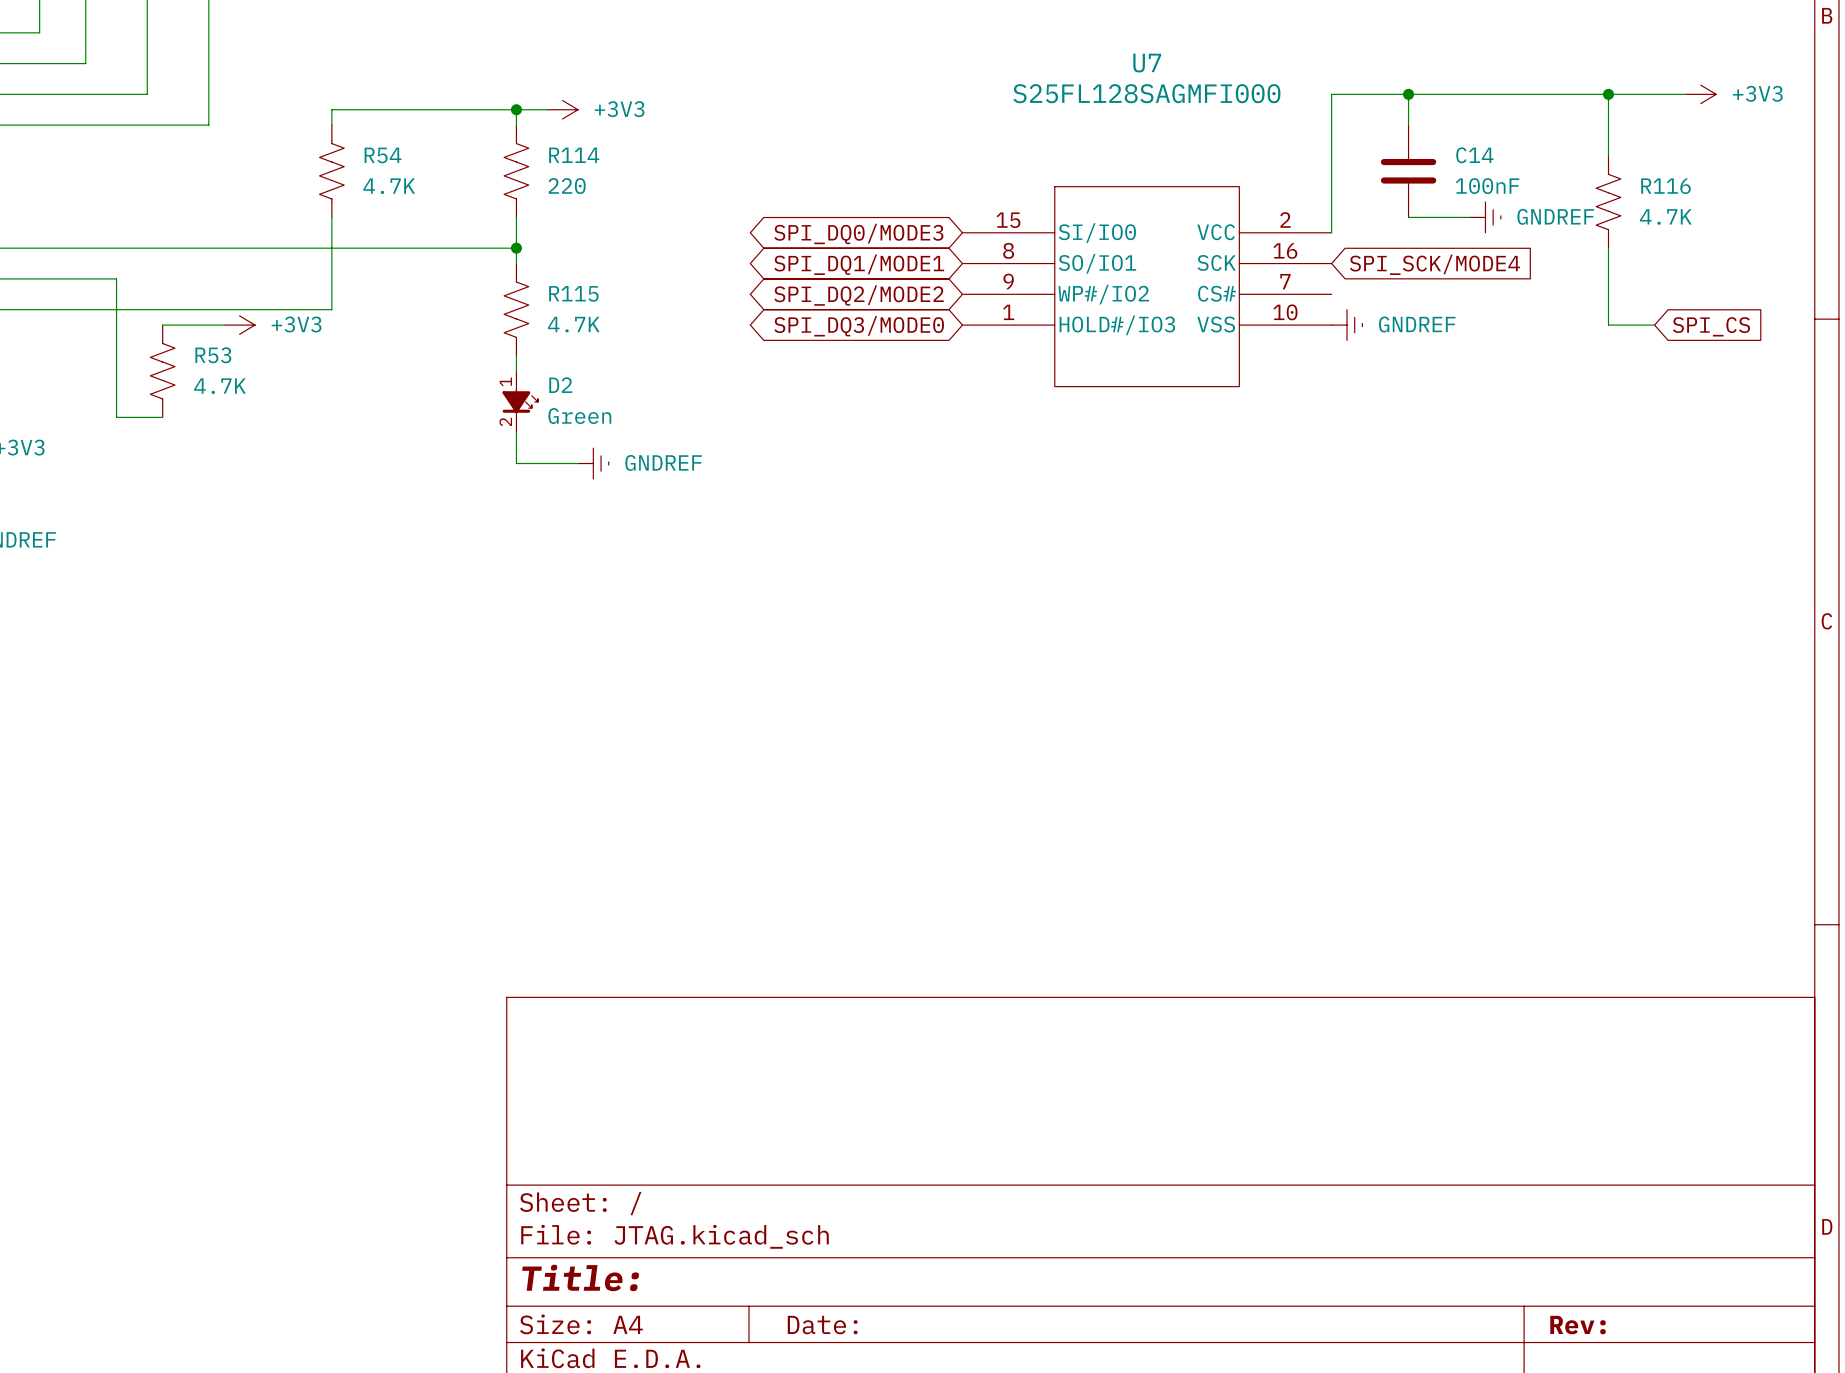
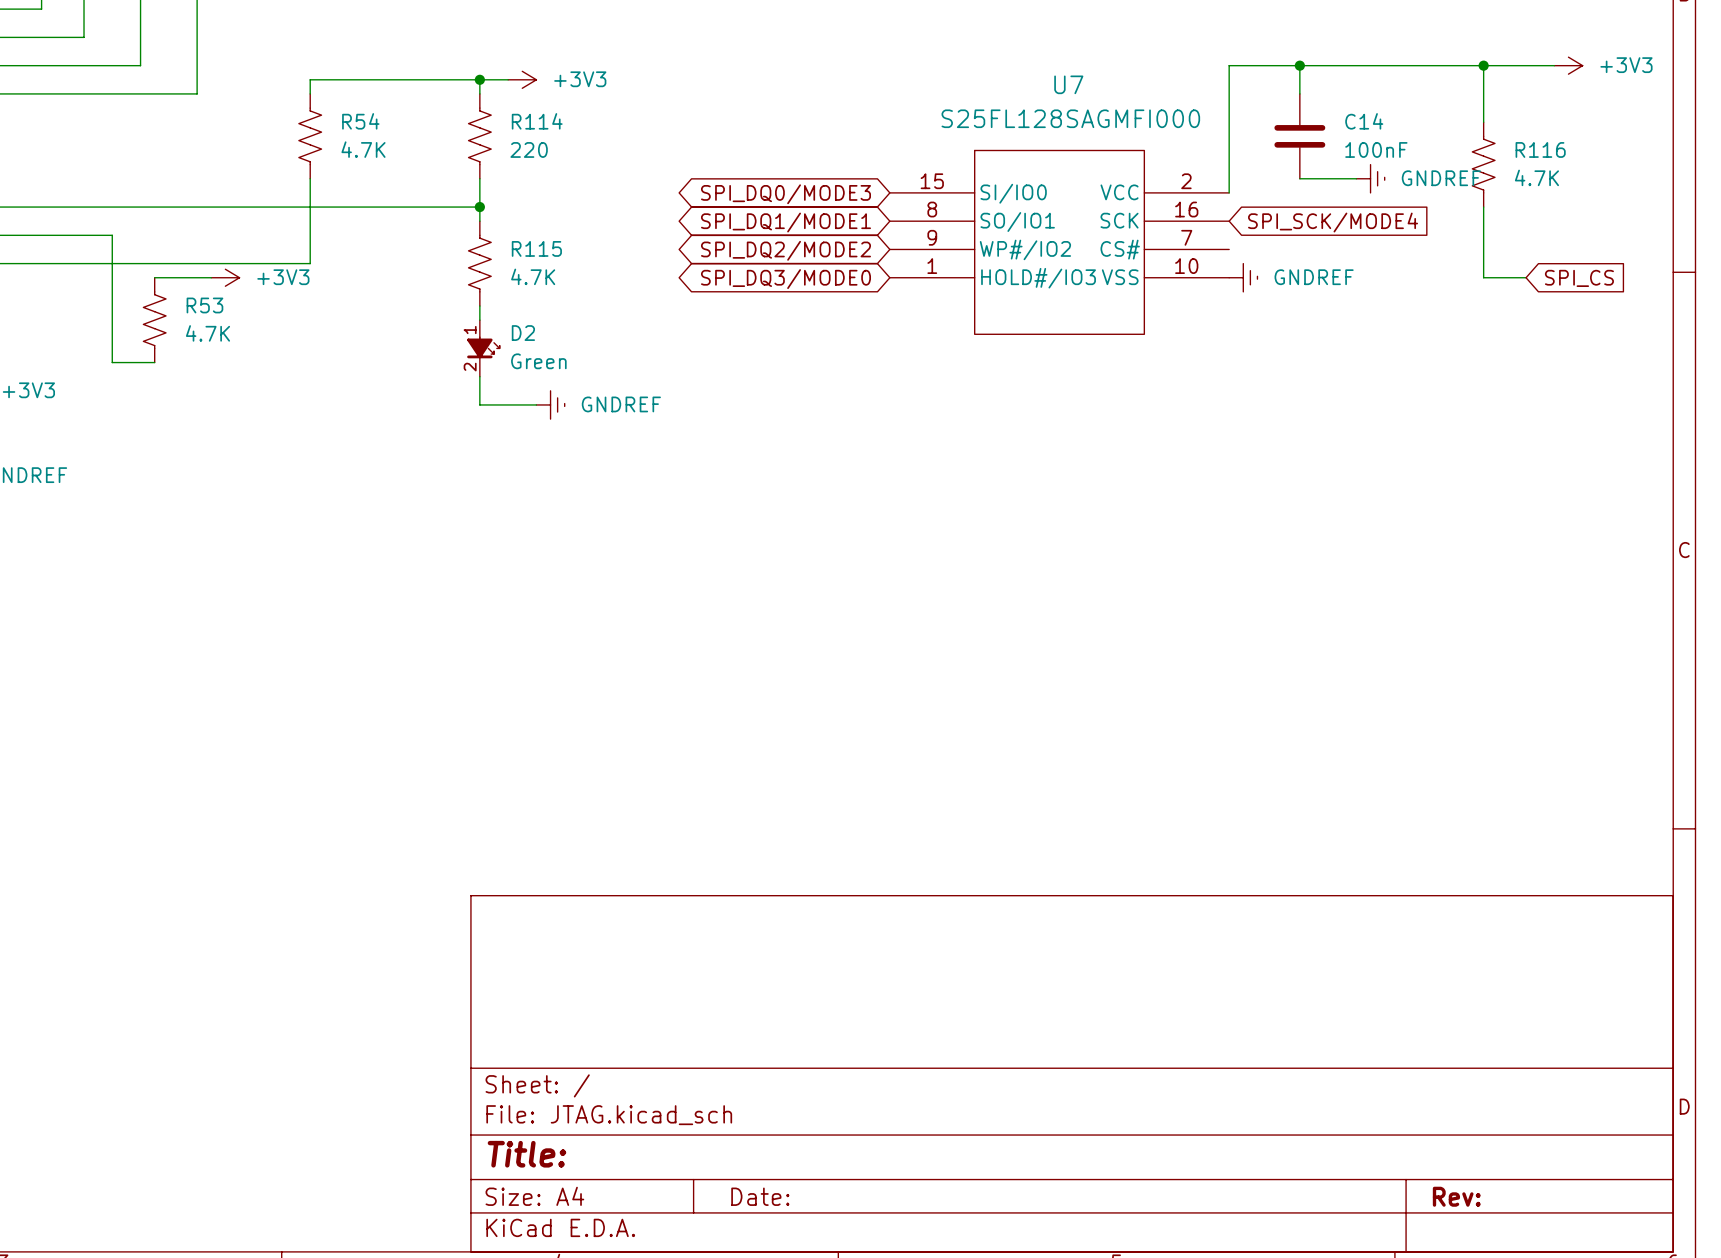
U7 name position: U7 (1147, 63) -> U7 (1068, 84)
U7 value position: S25FL128SAGMFI000 (1146, 93) -> S25FL128SAGMFI000 (1070, 118)

